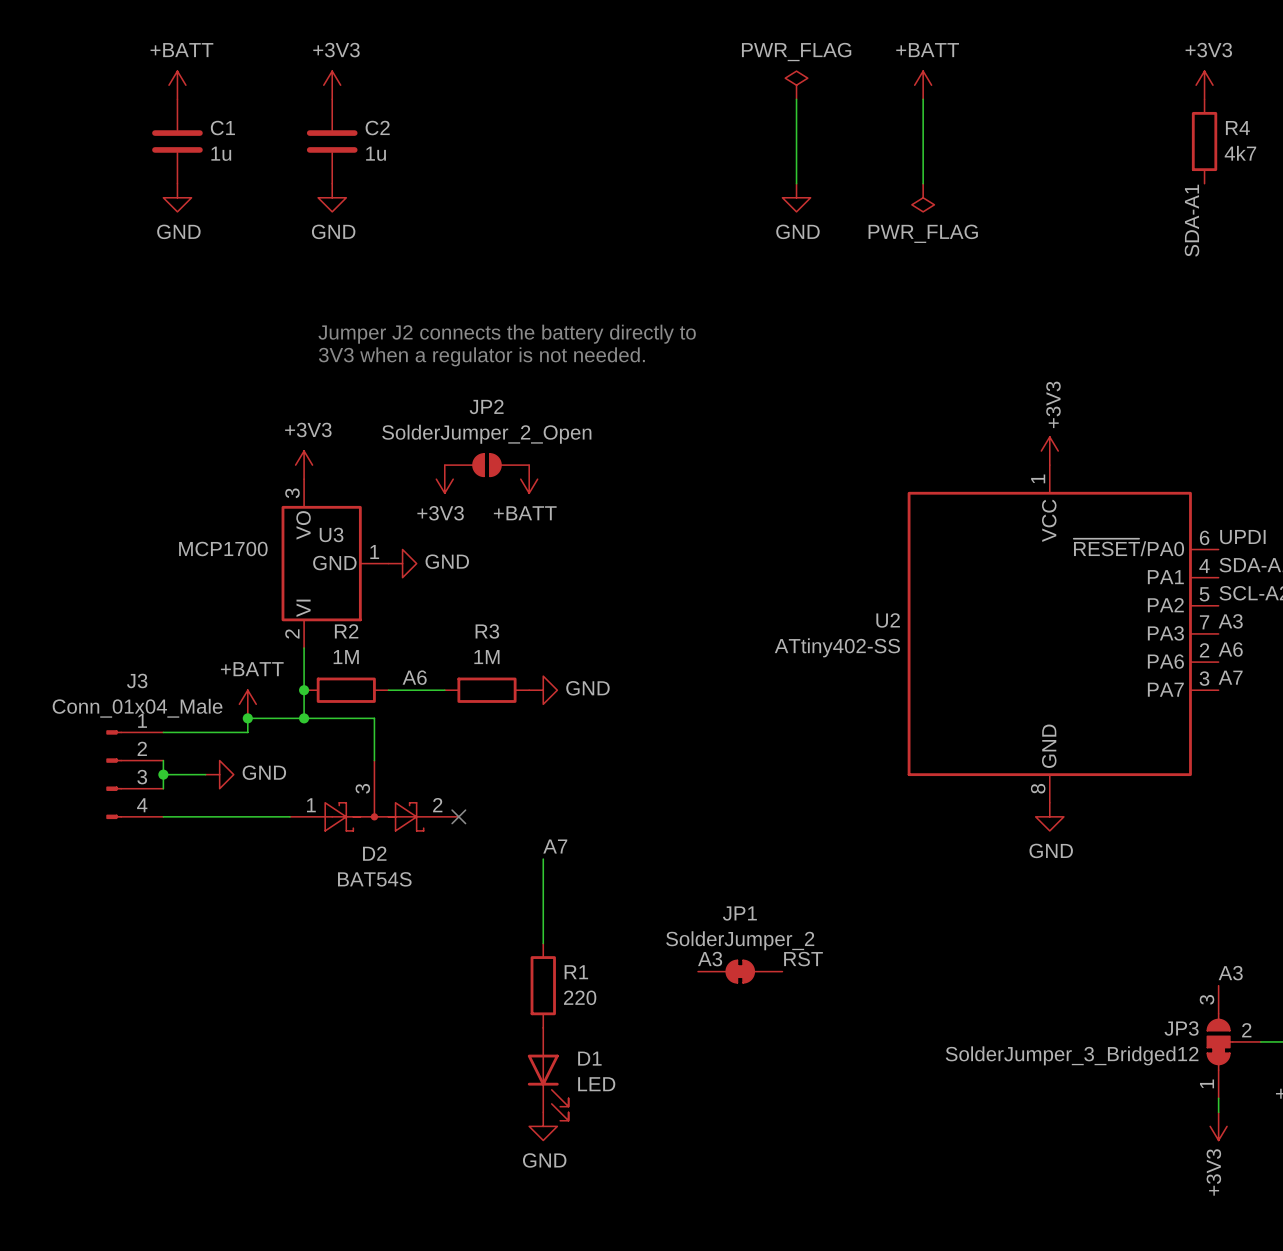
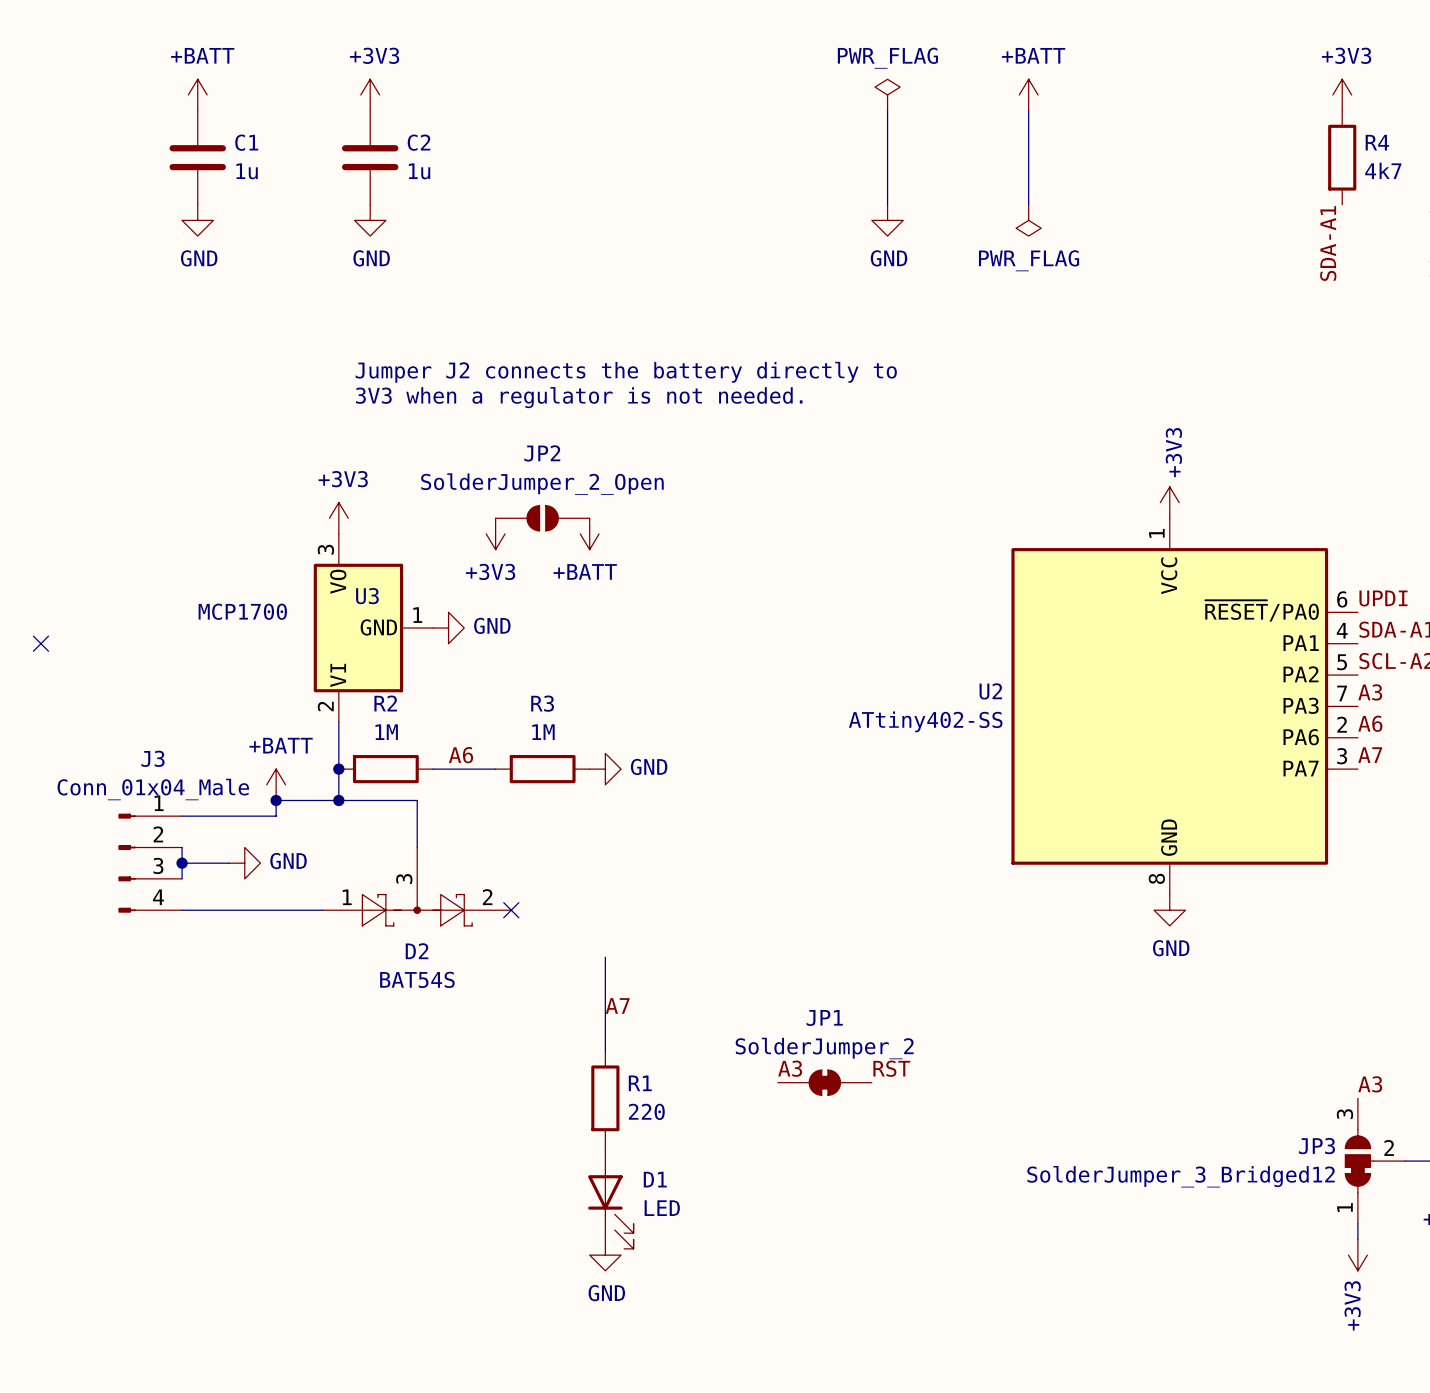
no-connect mark: none -> (40, 643)
label position: A7 (555, 846) -> A7 (617, 1005)

